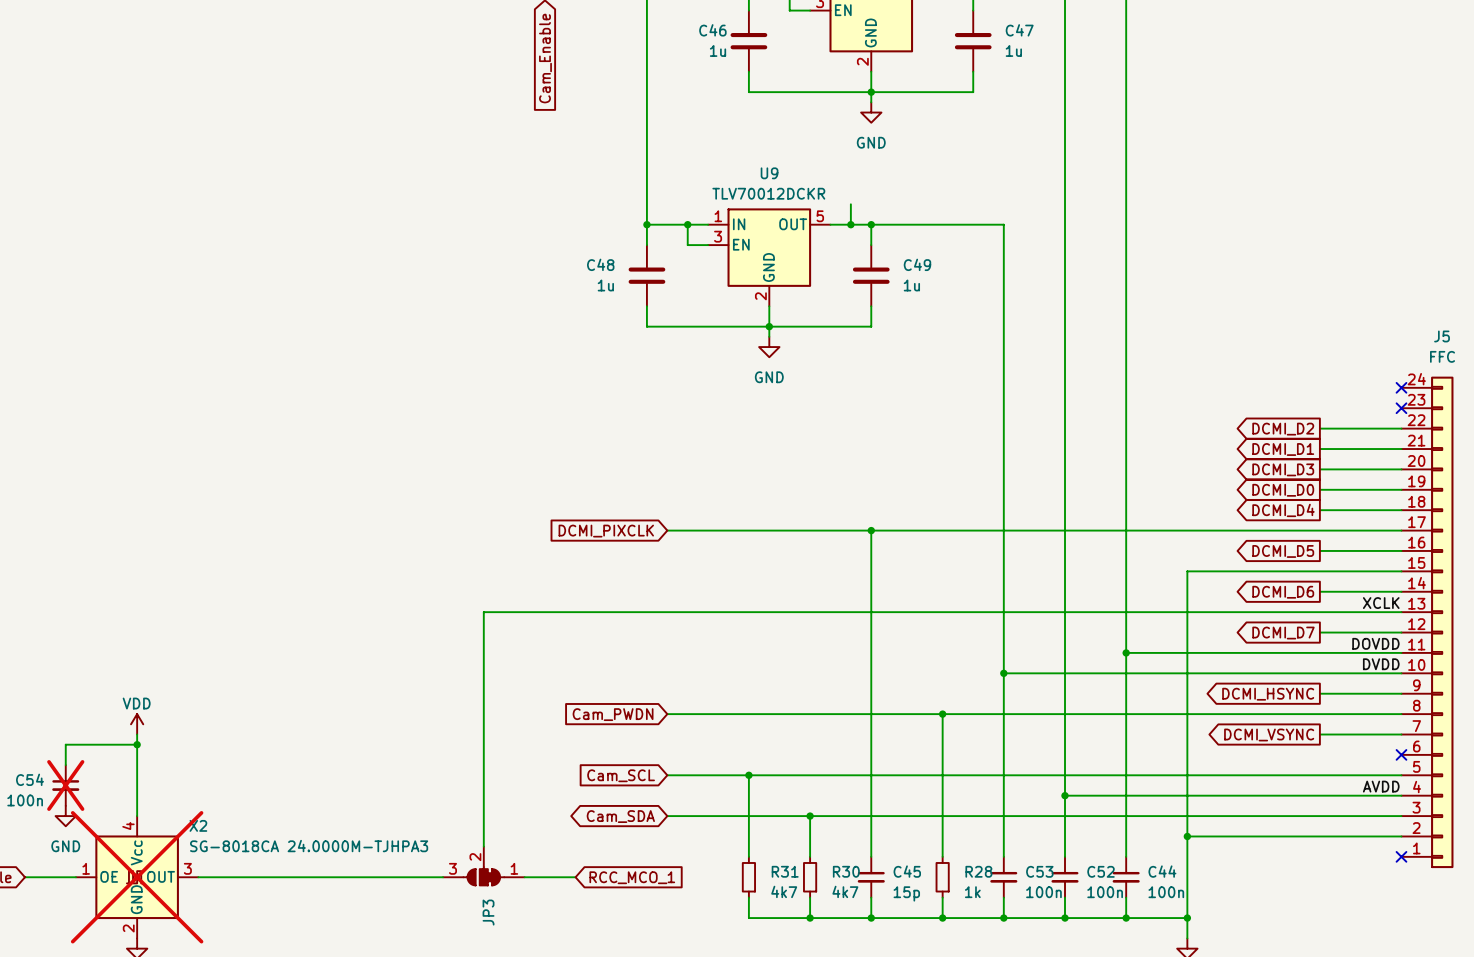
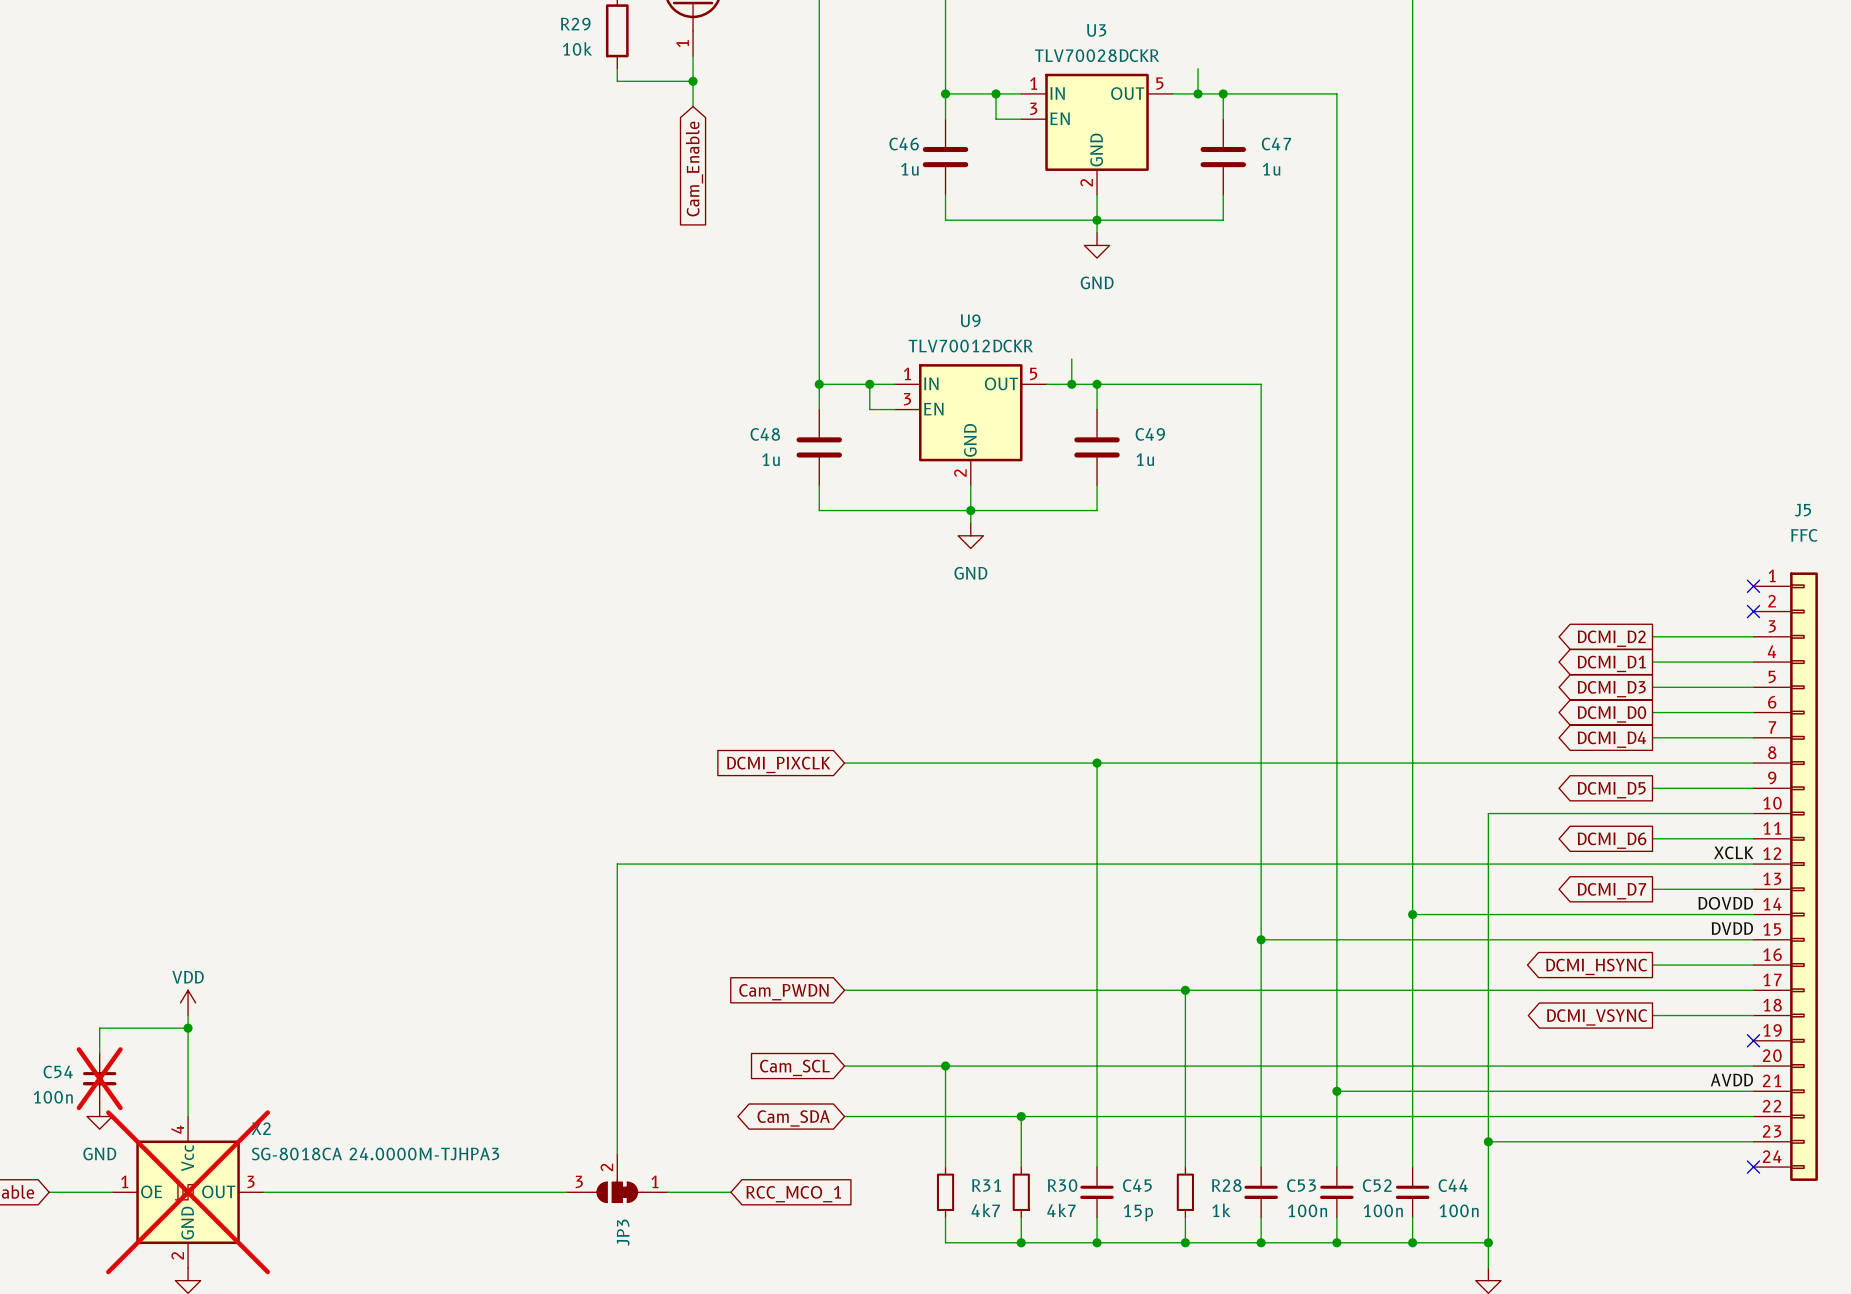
J5 flip: as is (1442, 622) -> up-down (1803, 876)

